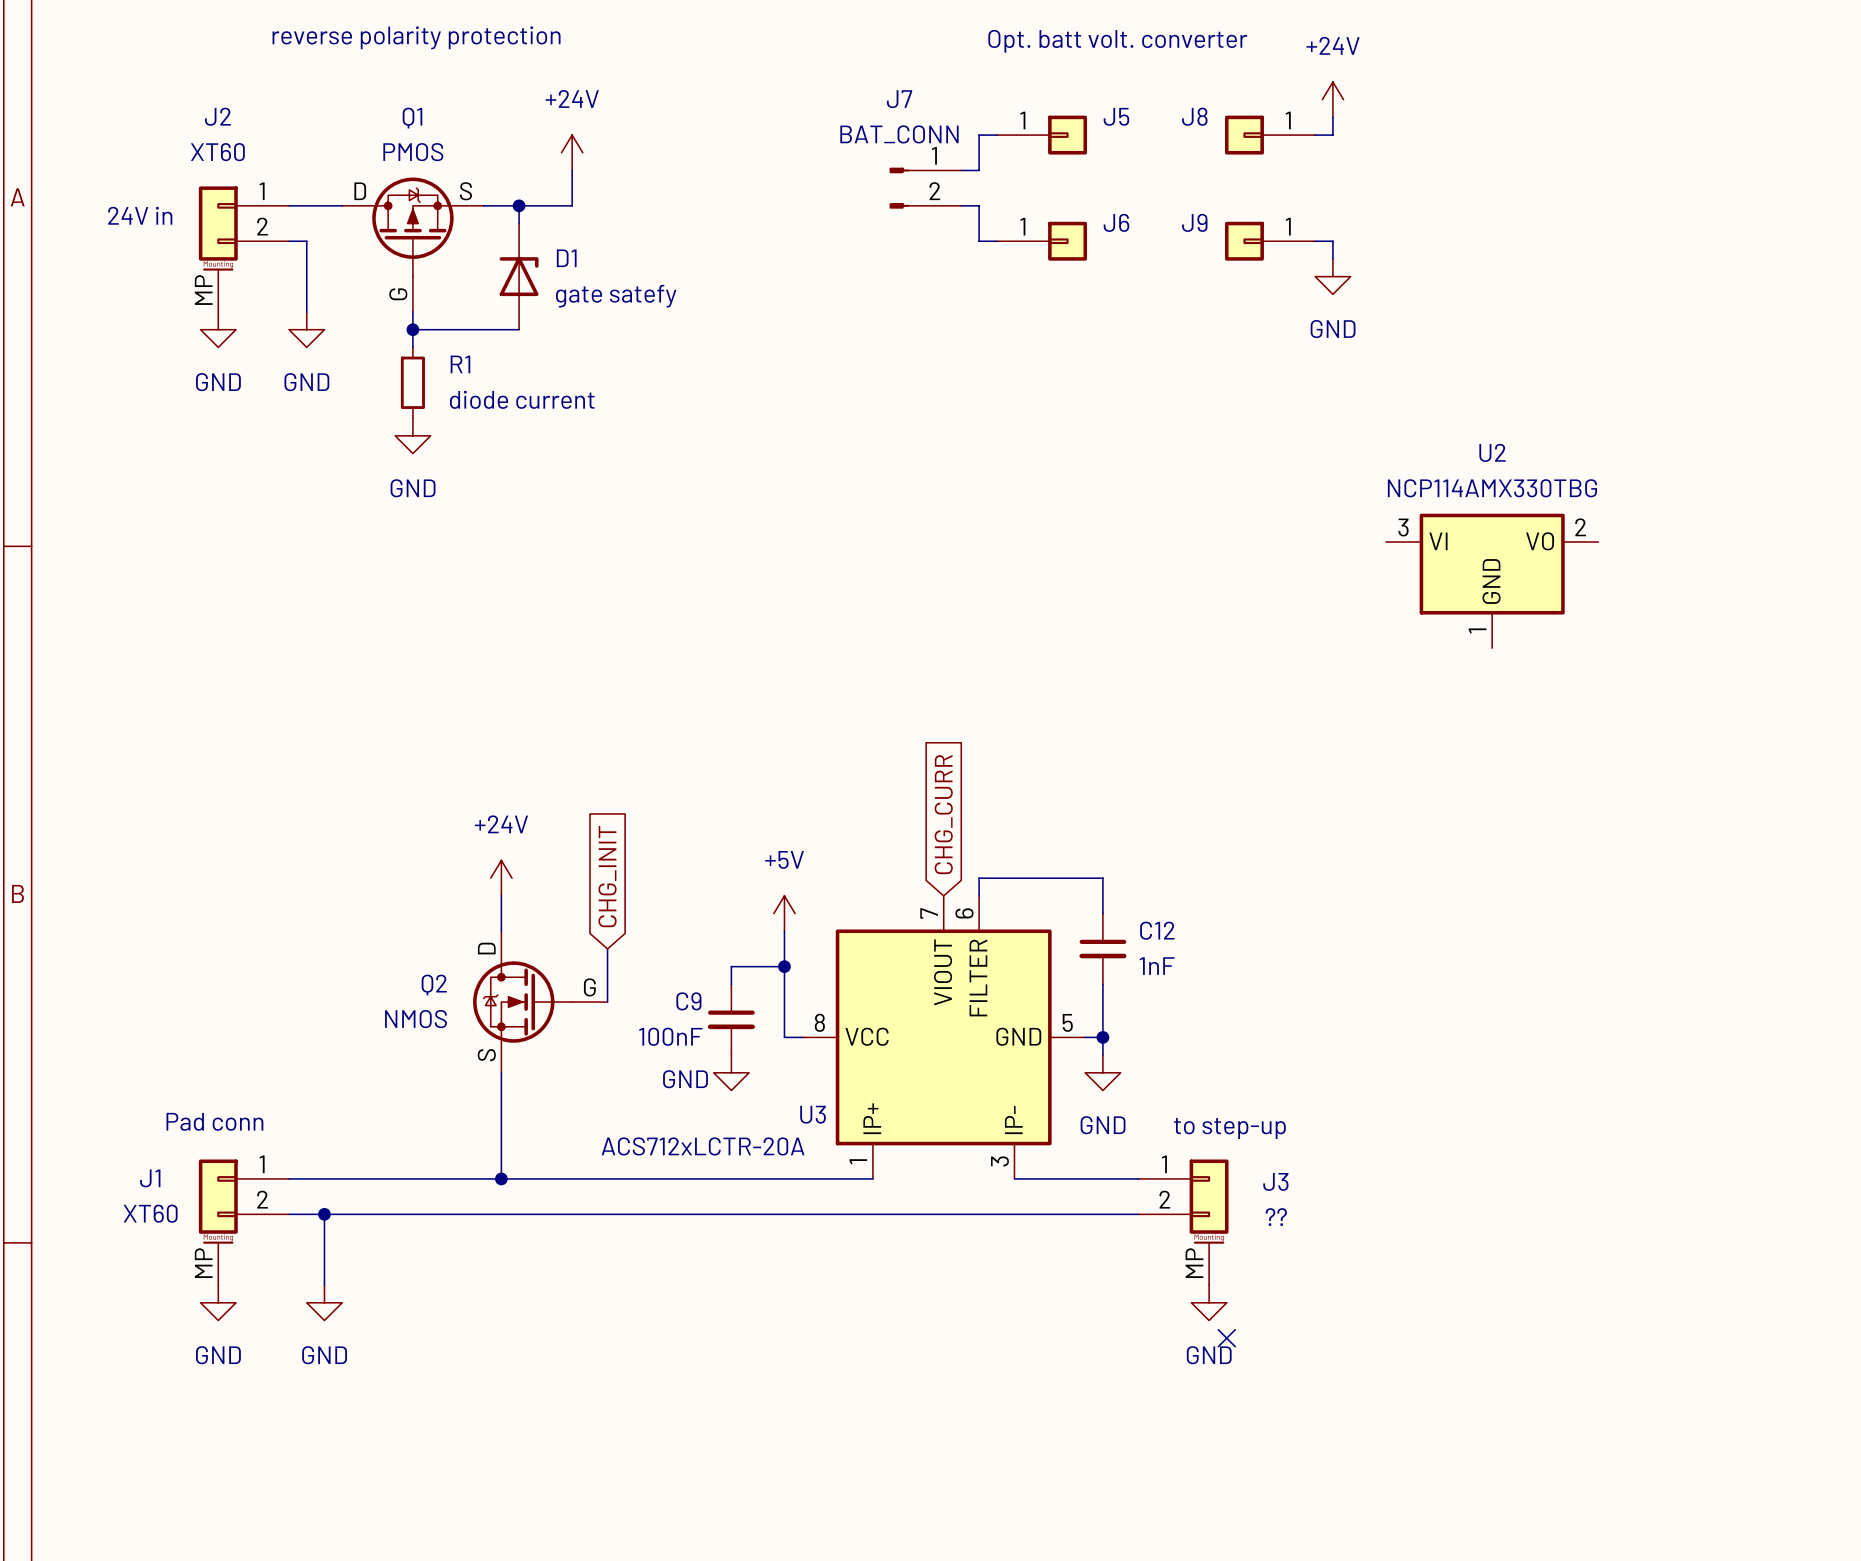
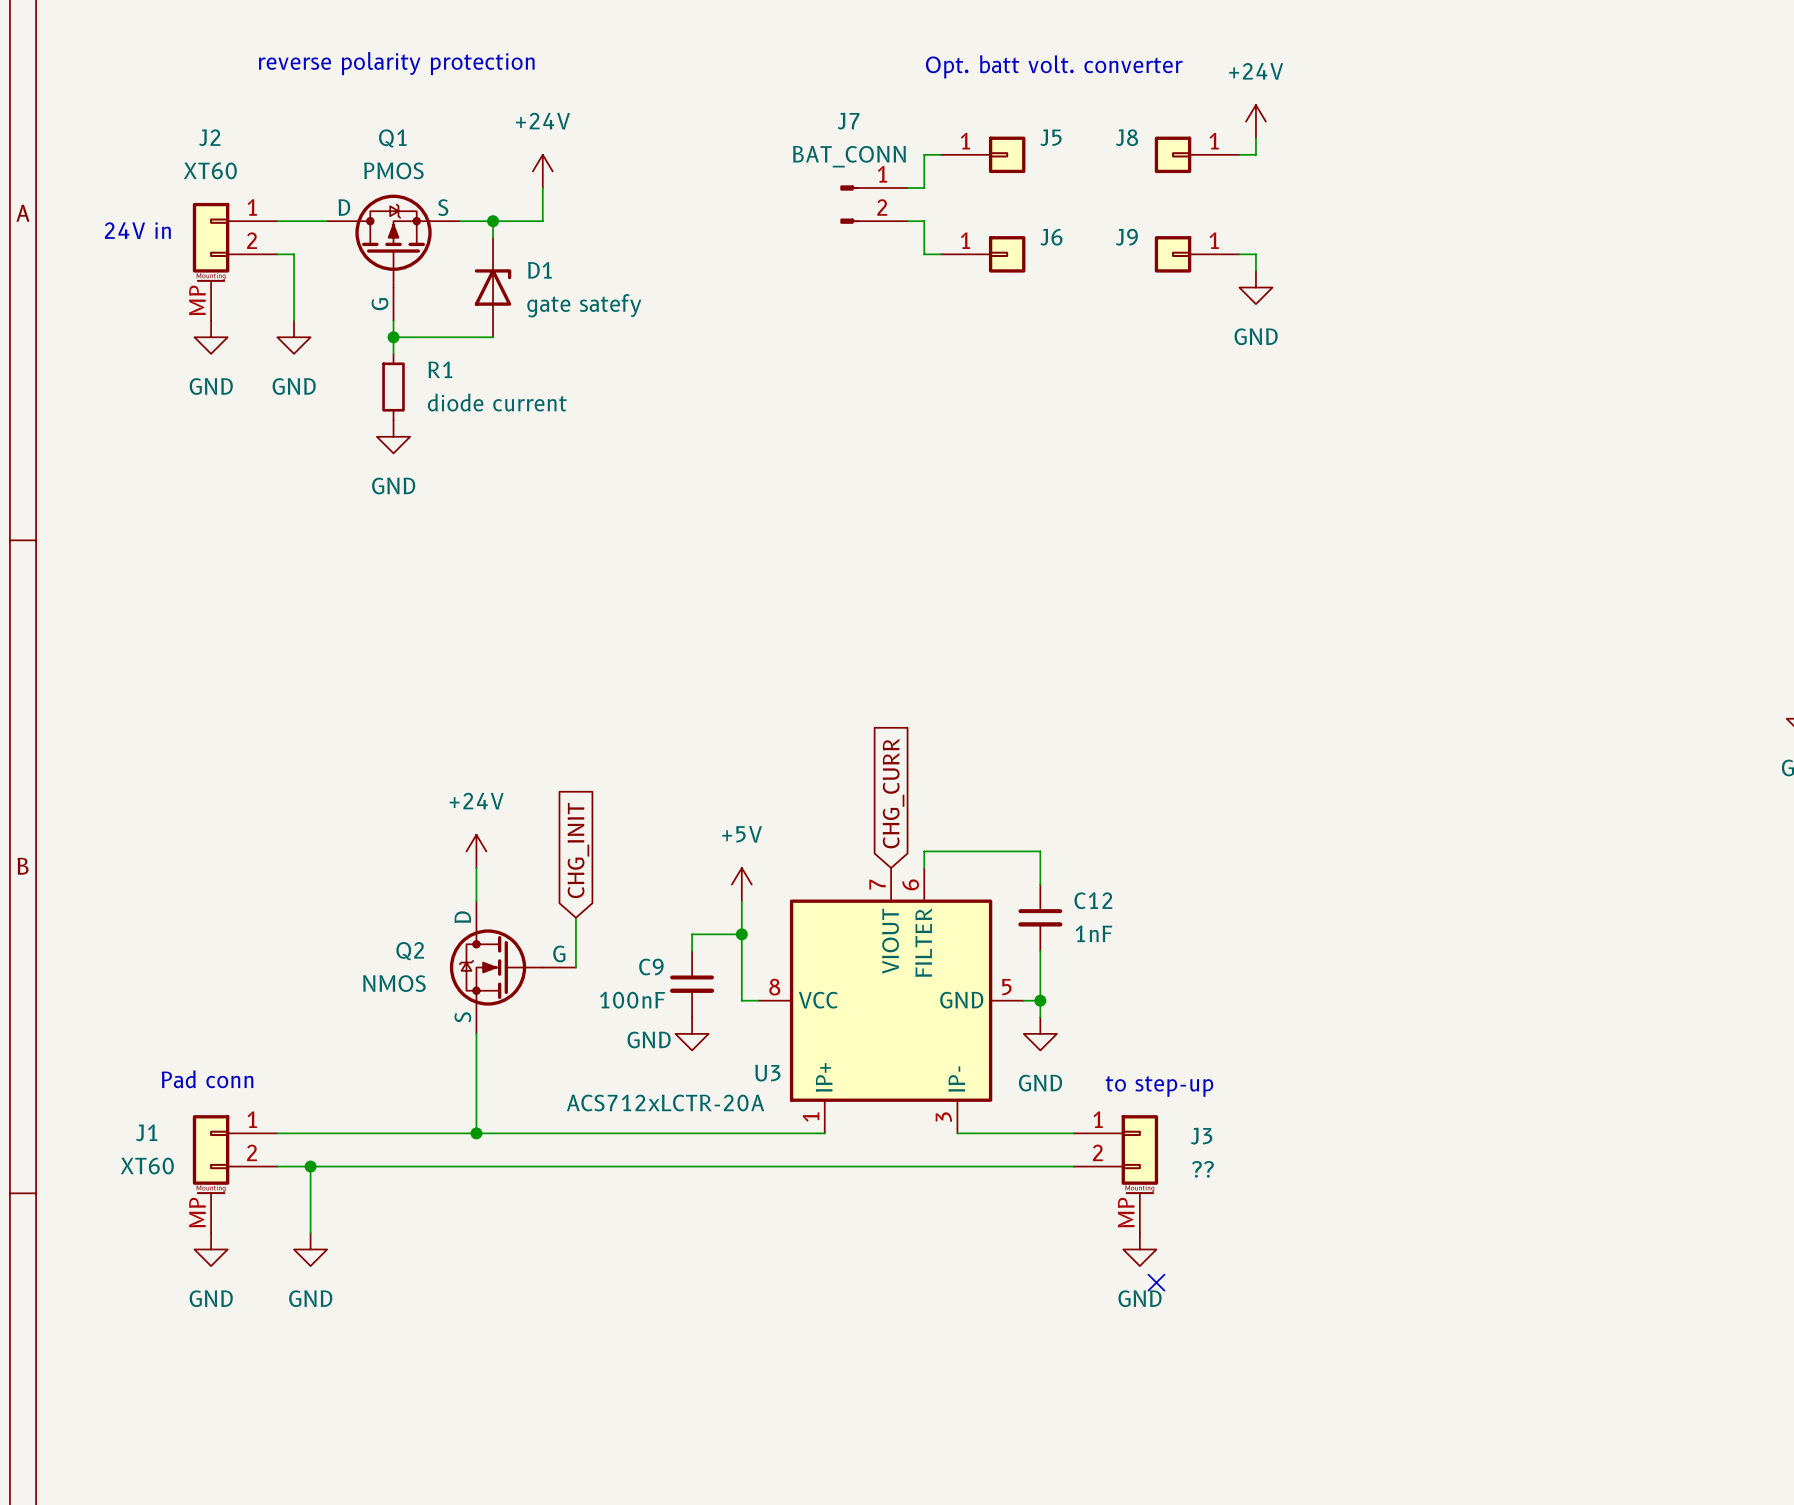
U2: NCP114AMX330TBG (1492, 580) -> none

